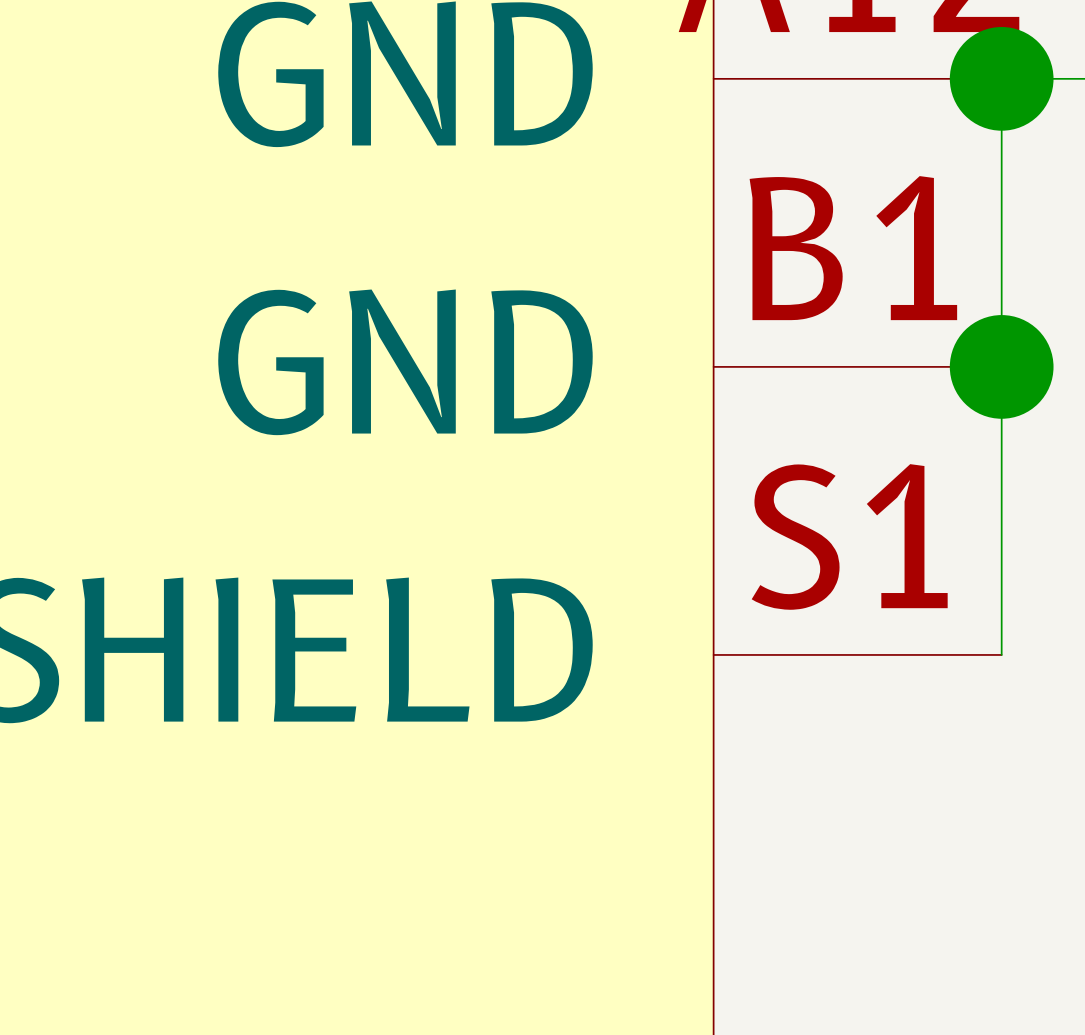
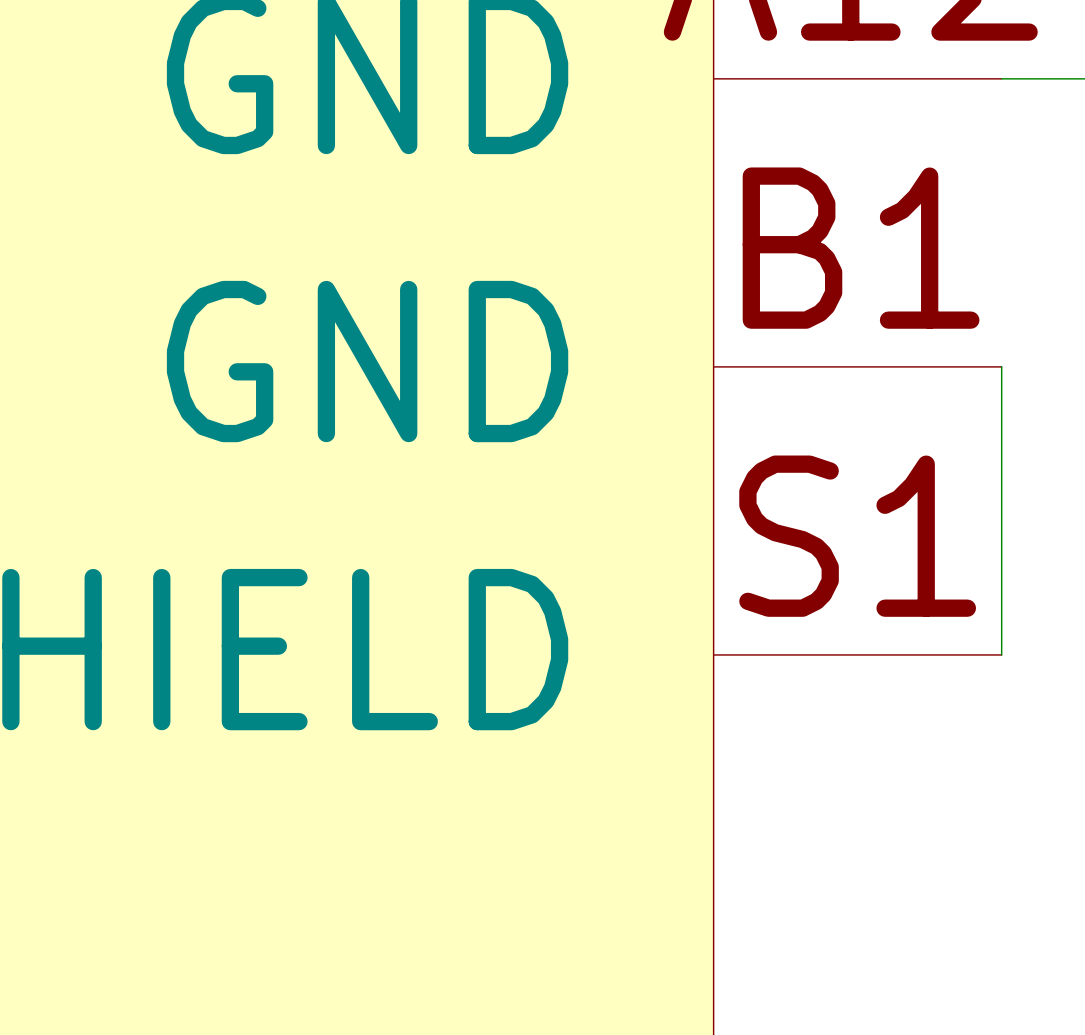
wire: (1001, 78) (1001, 366) -> none
junction: (1001, 78) -> none
junction: (1001, 366) -> none

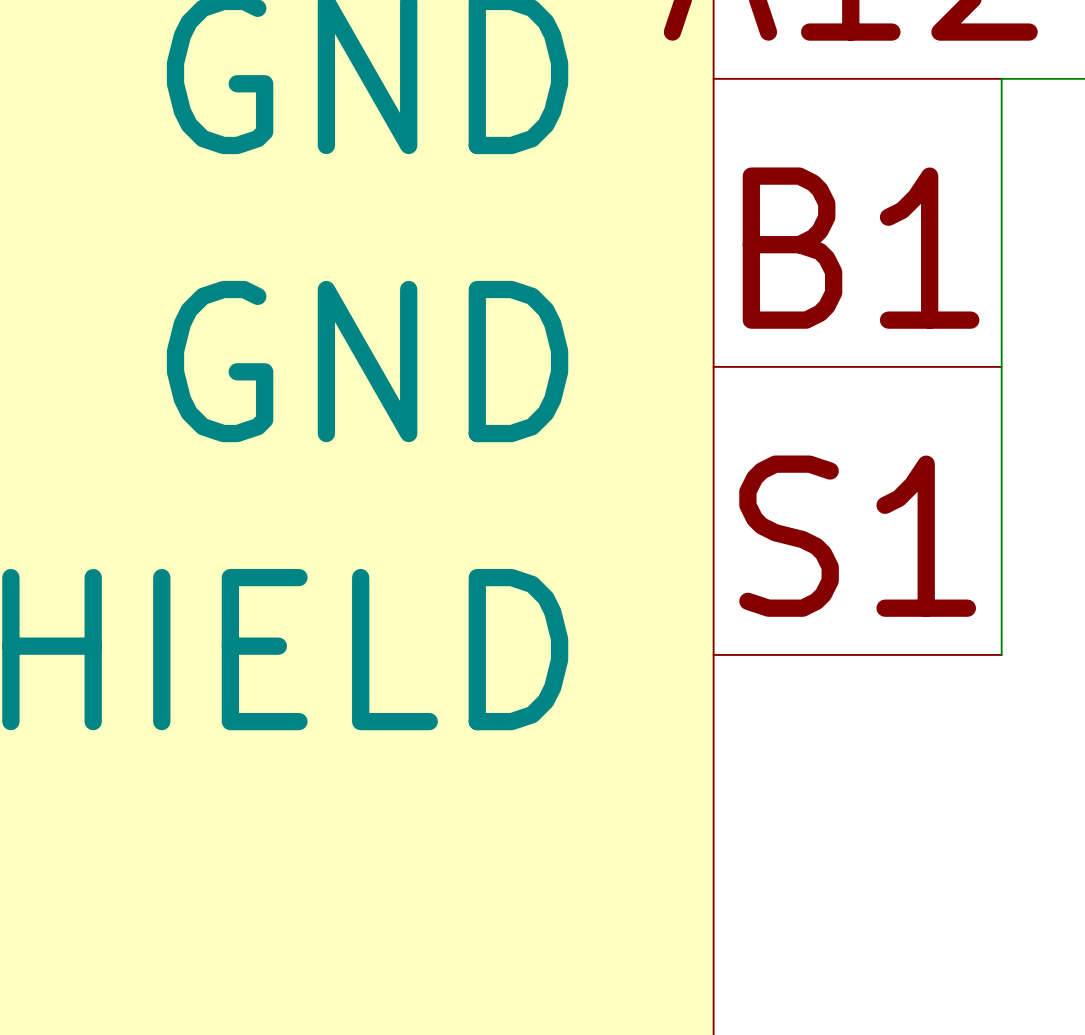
wire: none -> (1001, 78) (1001, 366)

